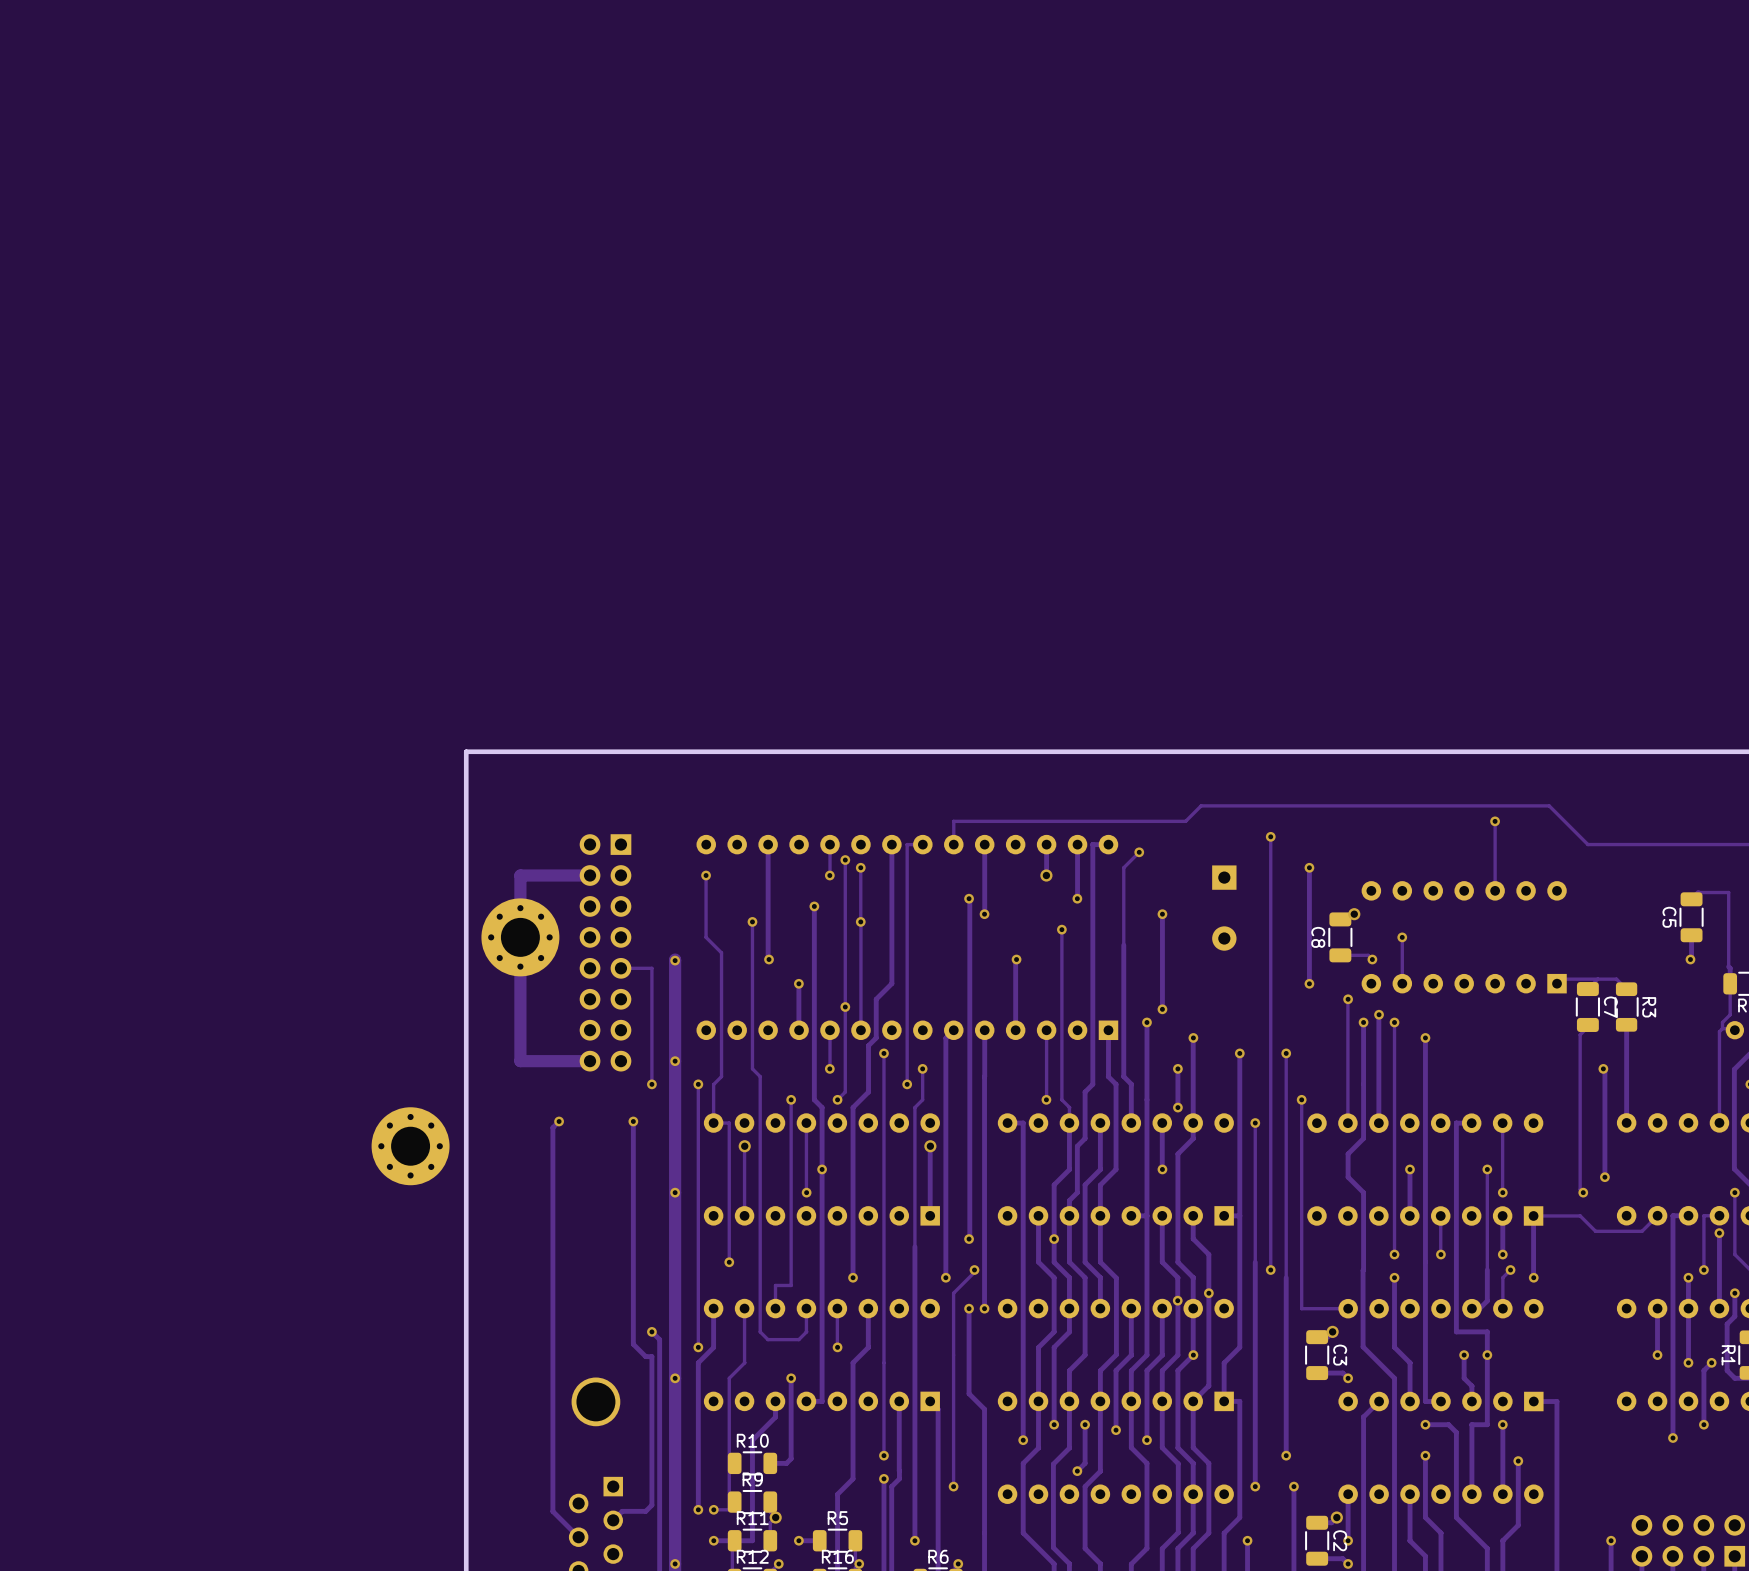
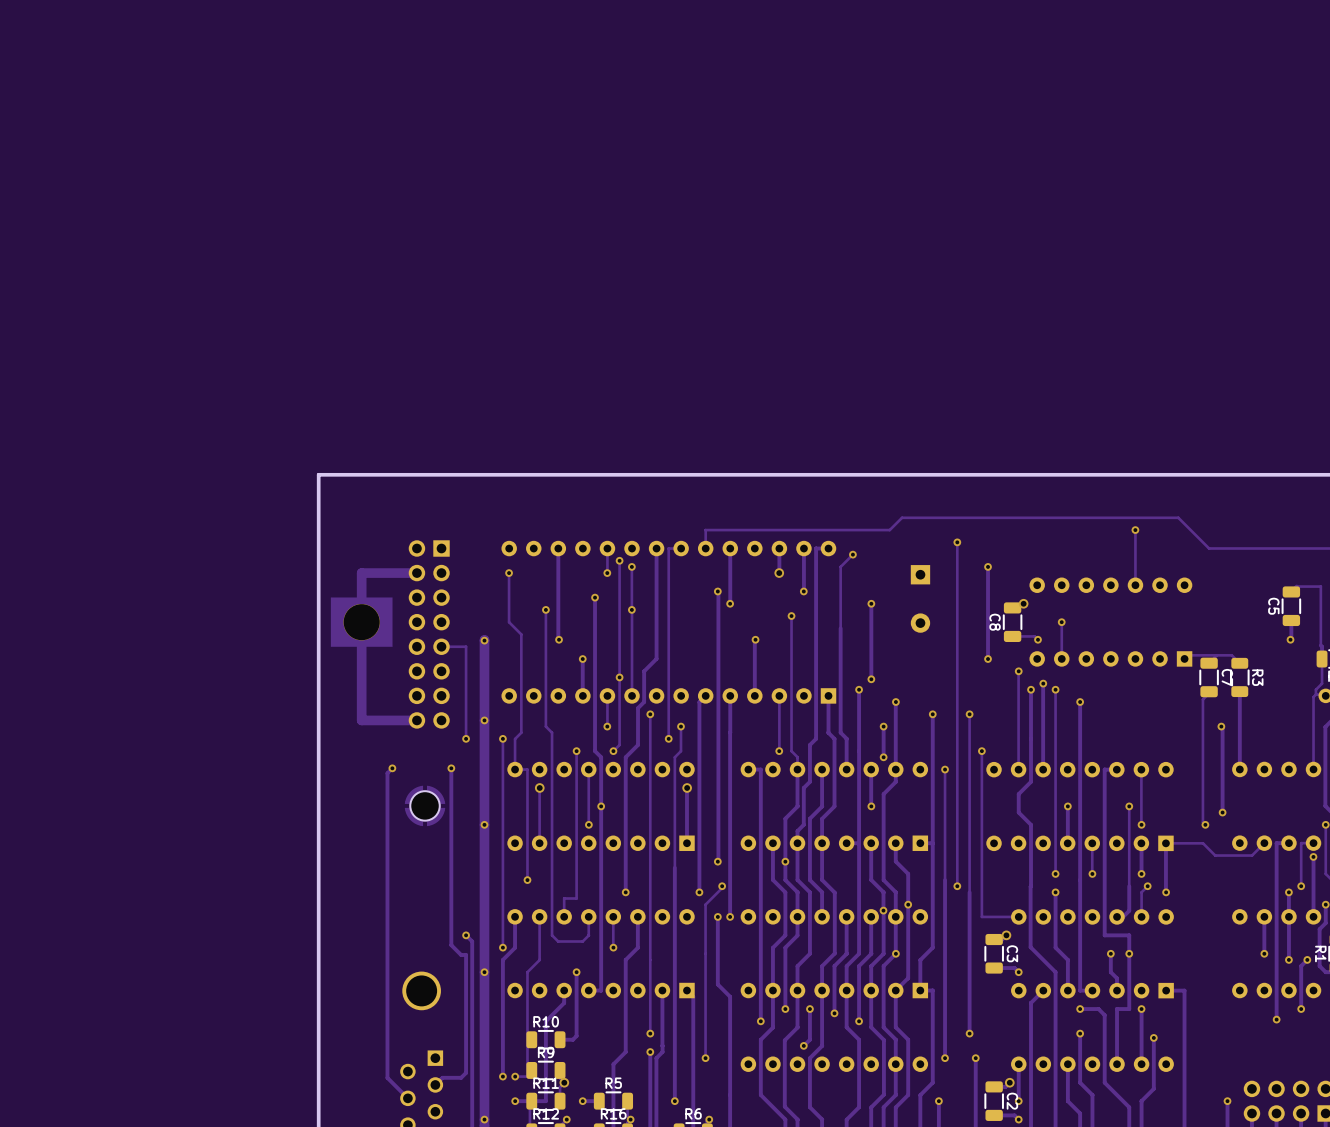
part footprint: [481, 898, 560, 977] -> [330, 597, 393, 647]
part: (410, 1146) -> none
part: none -> (425, 805)

